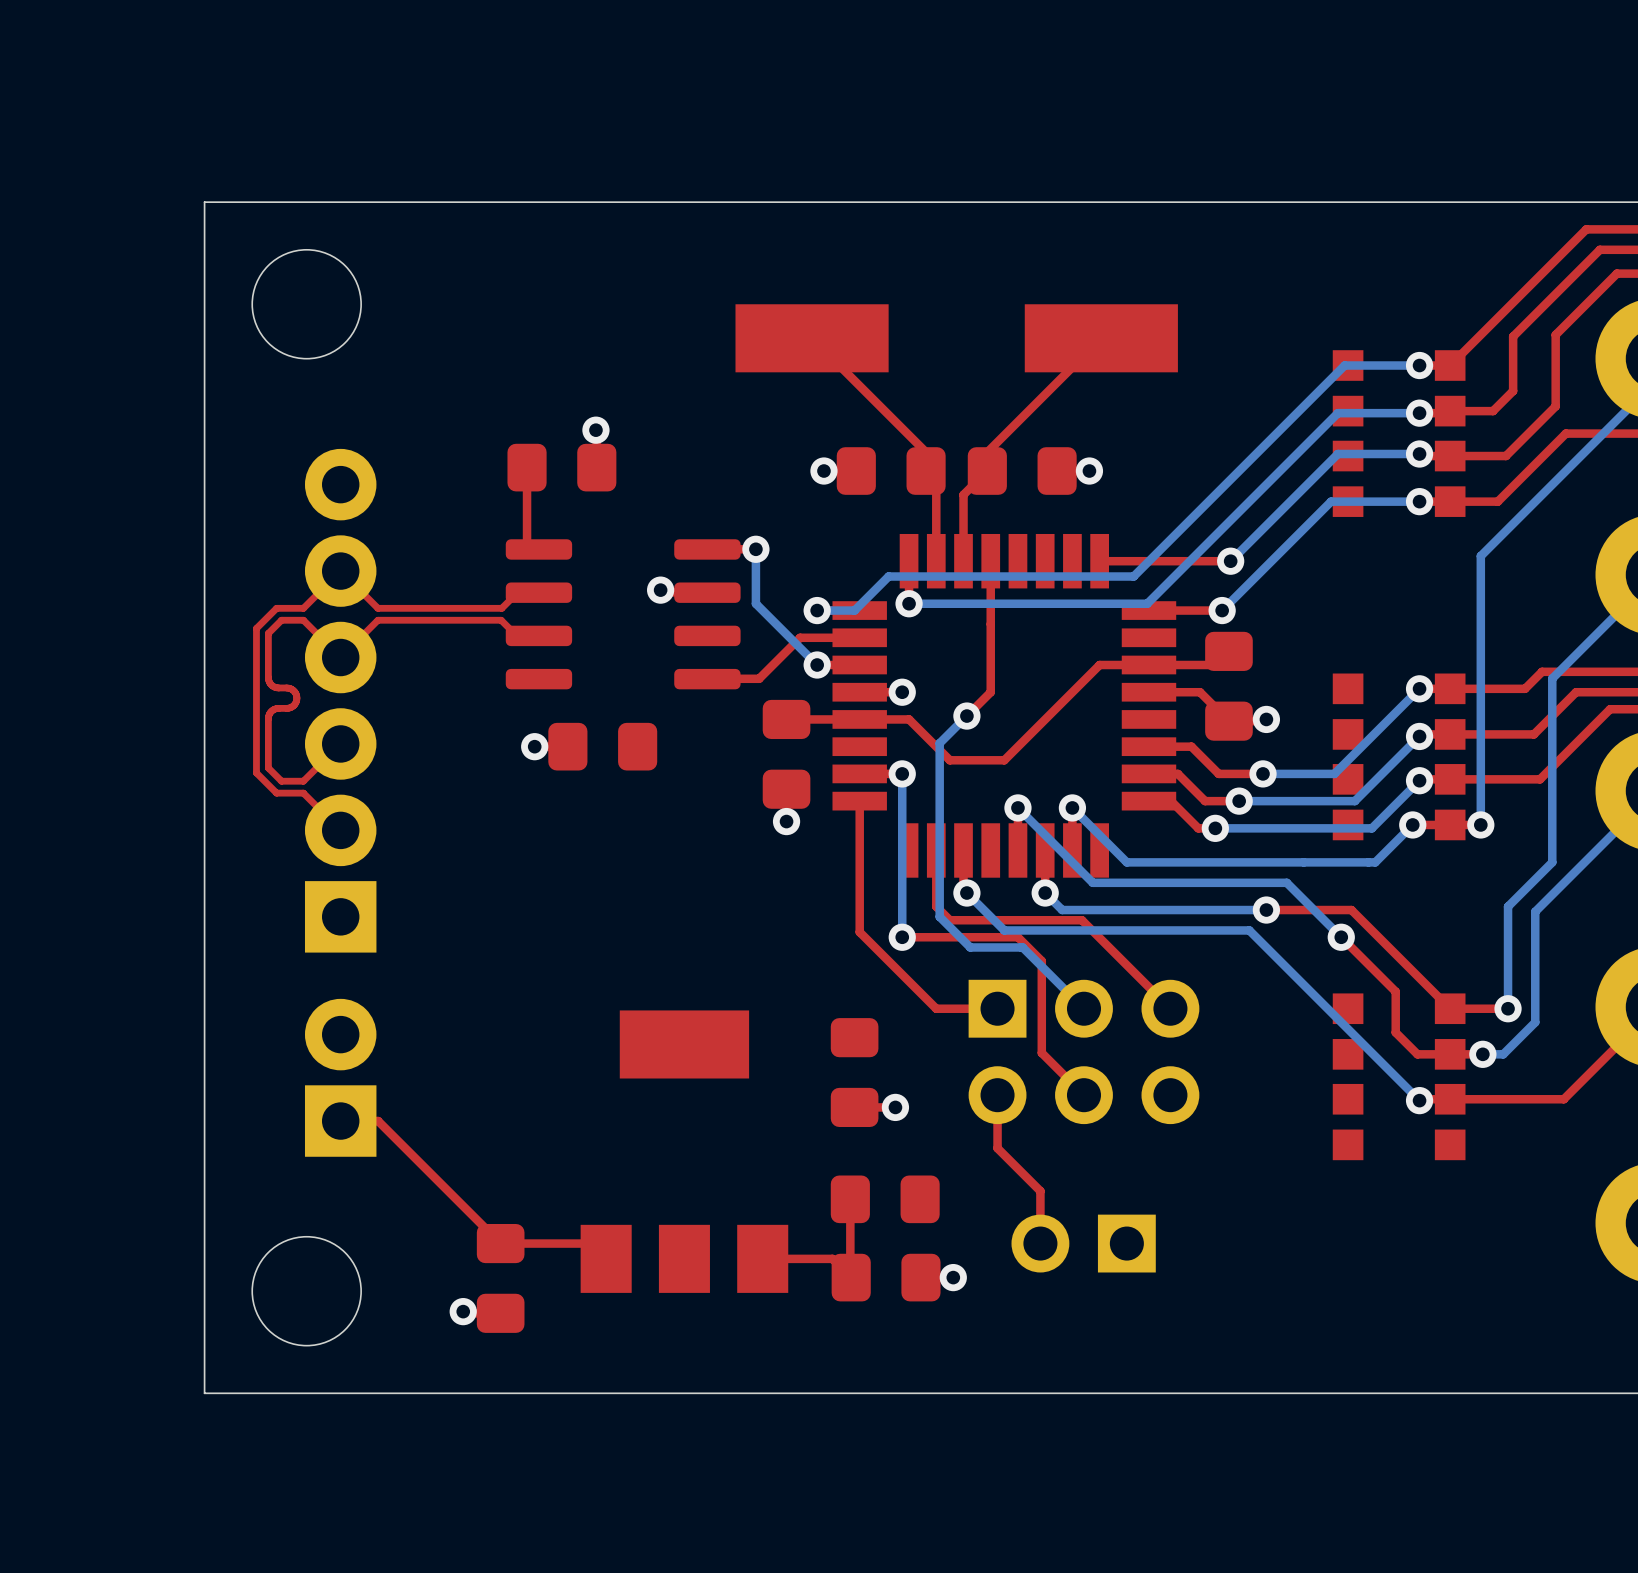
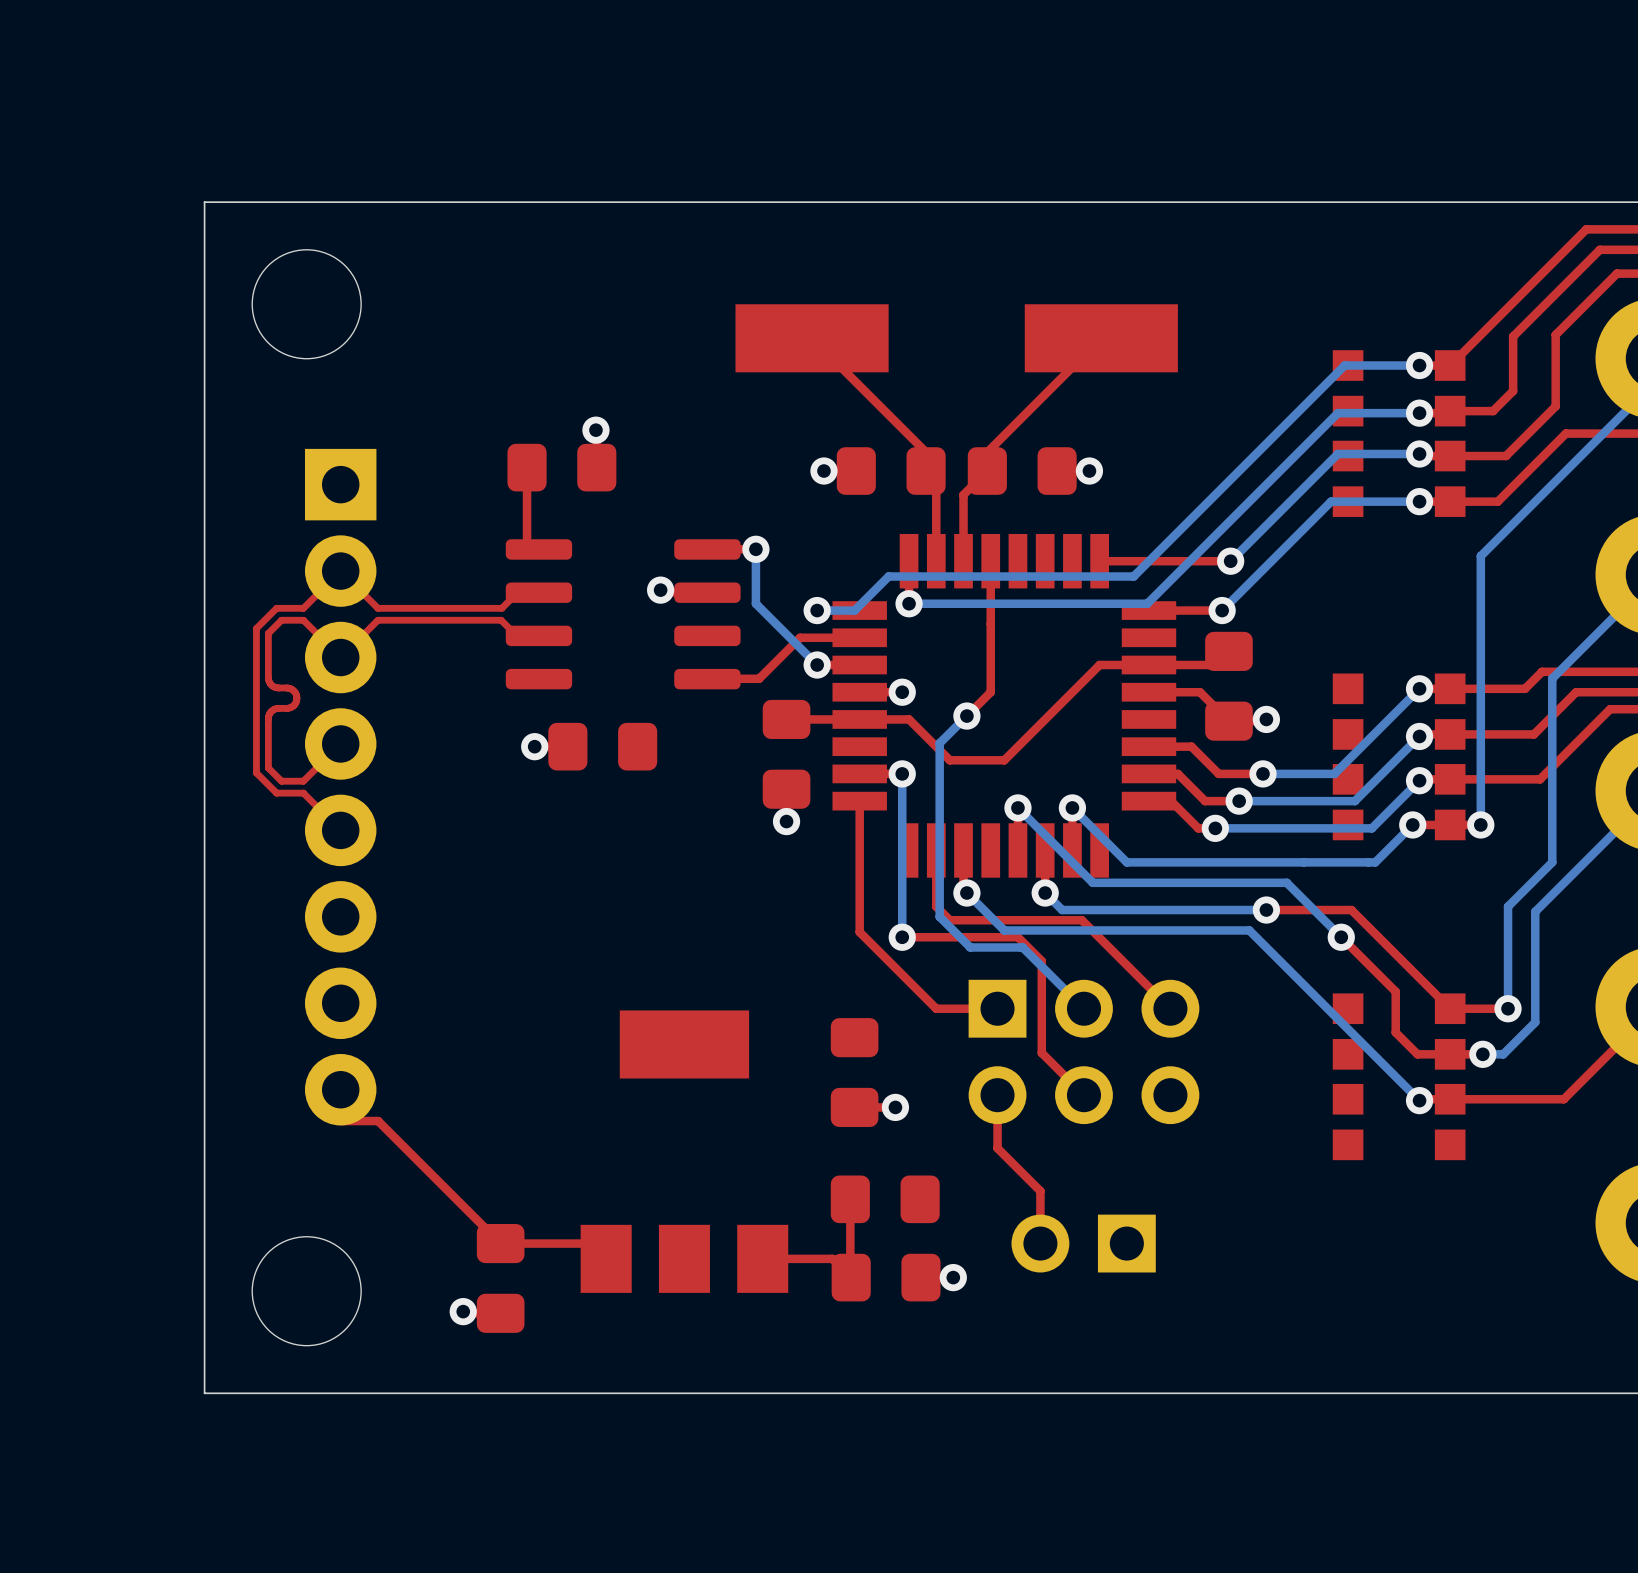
part: (340, 700) -> none
part: none -> (340, 787)
part: (340, 1077) -> none

